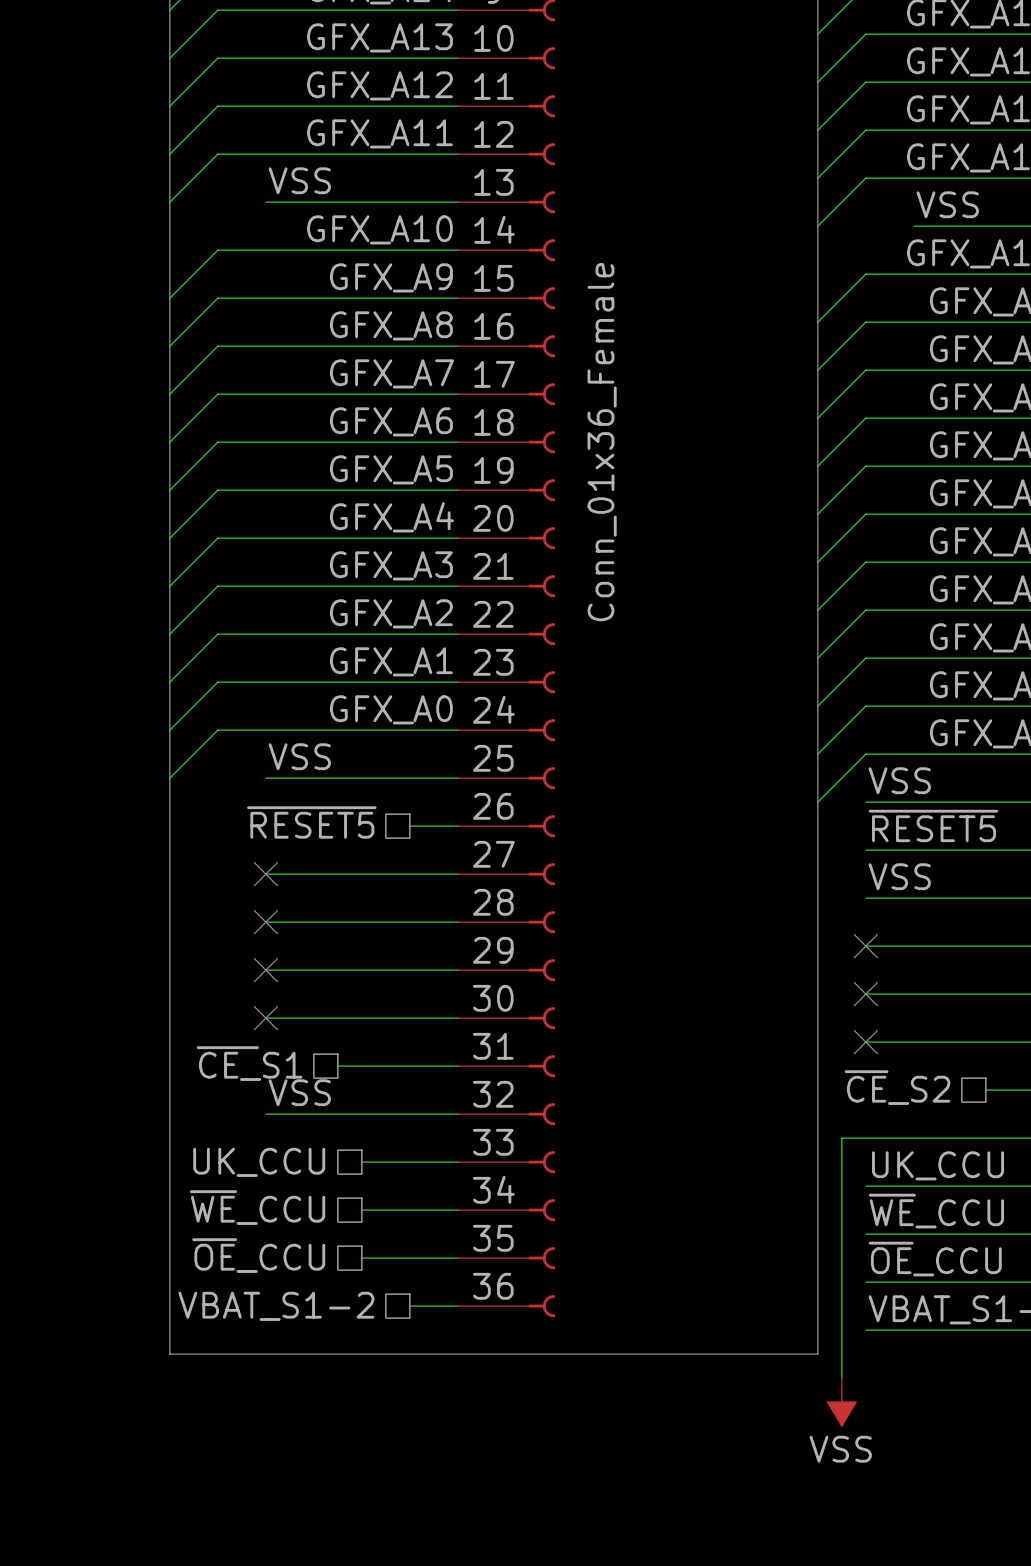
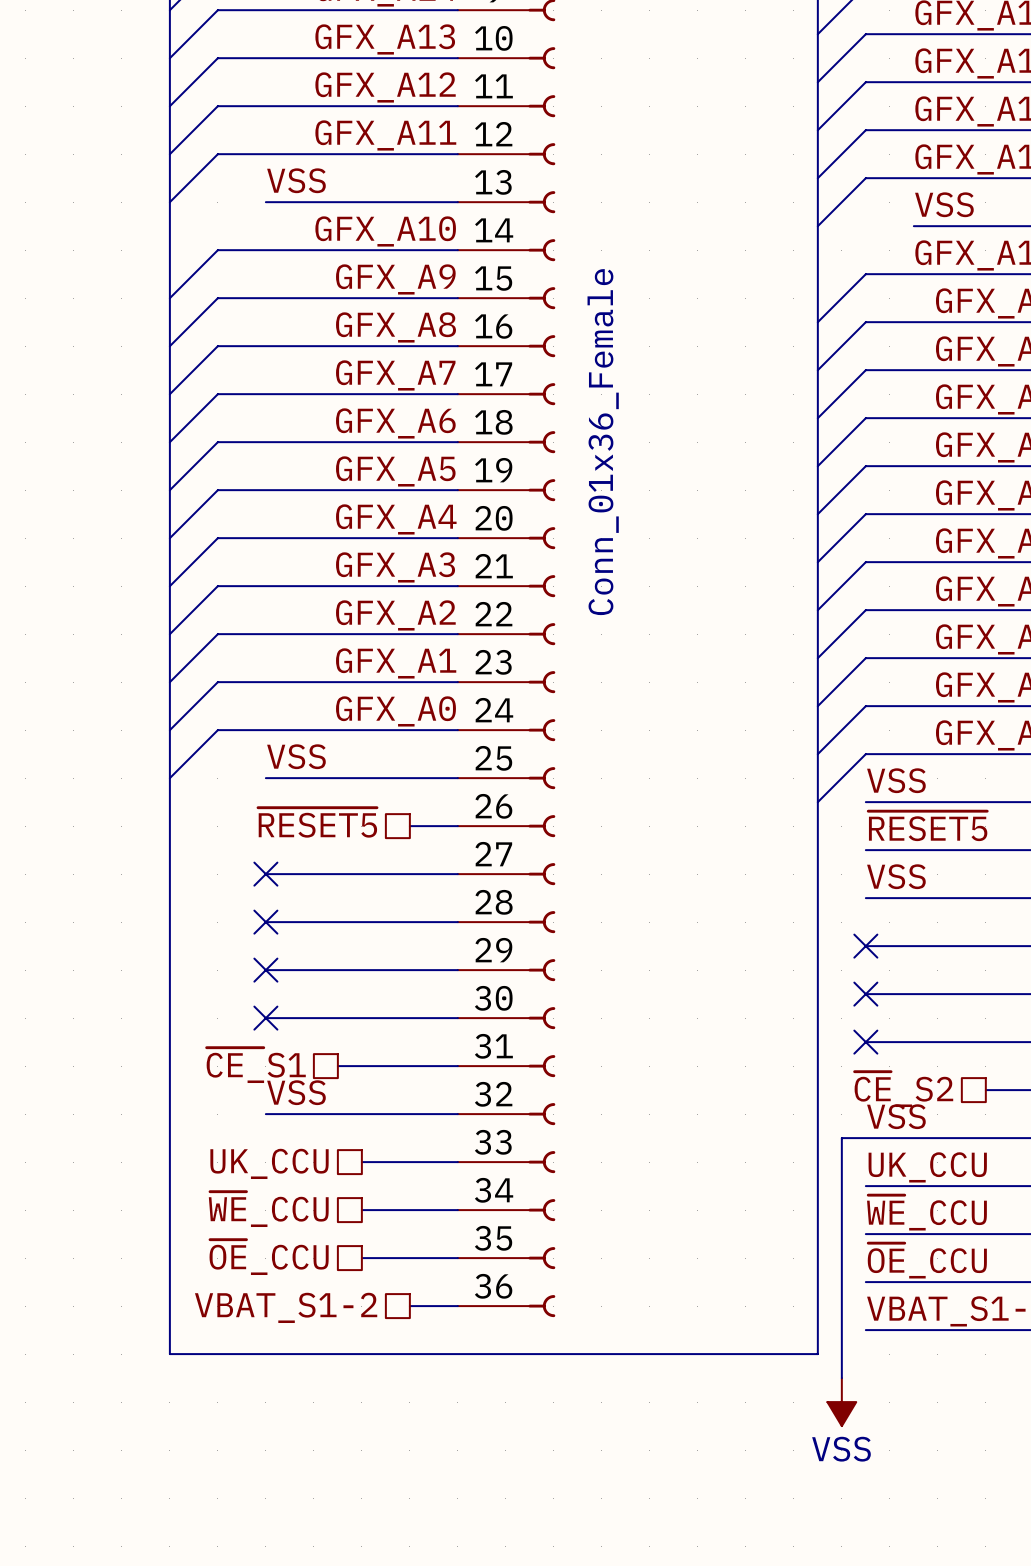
label: none -> VSS (896, 1116)

